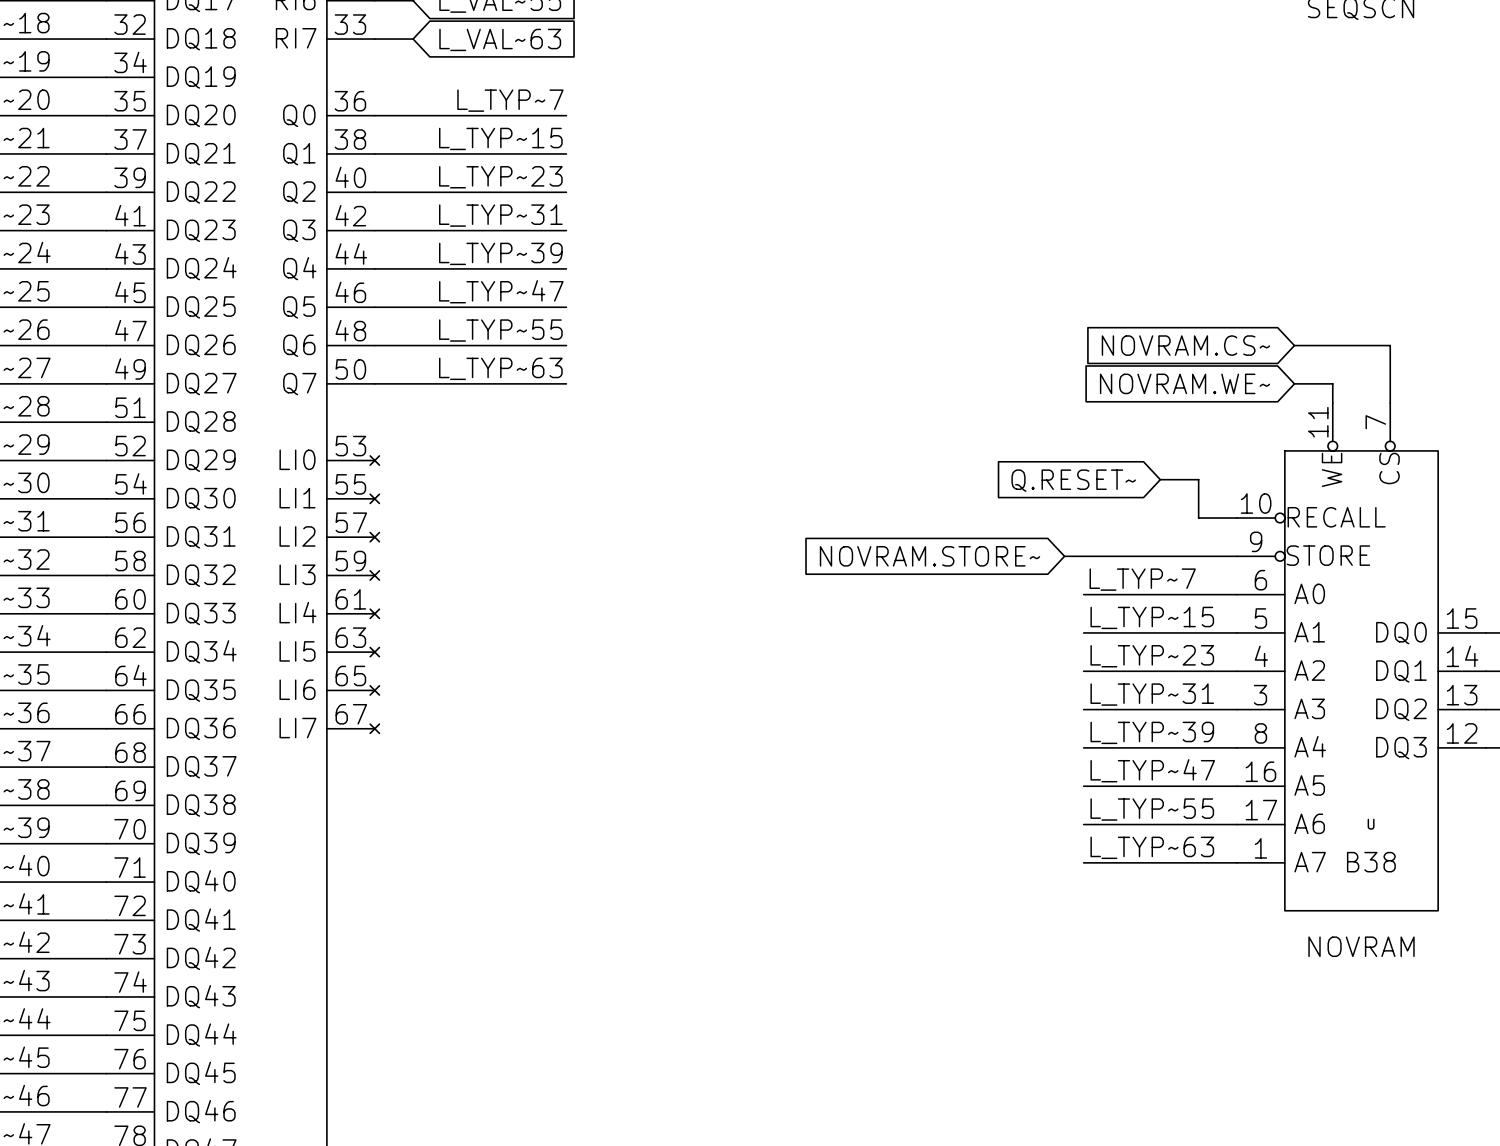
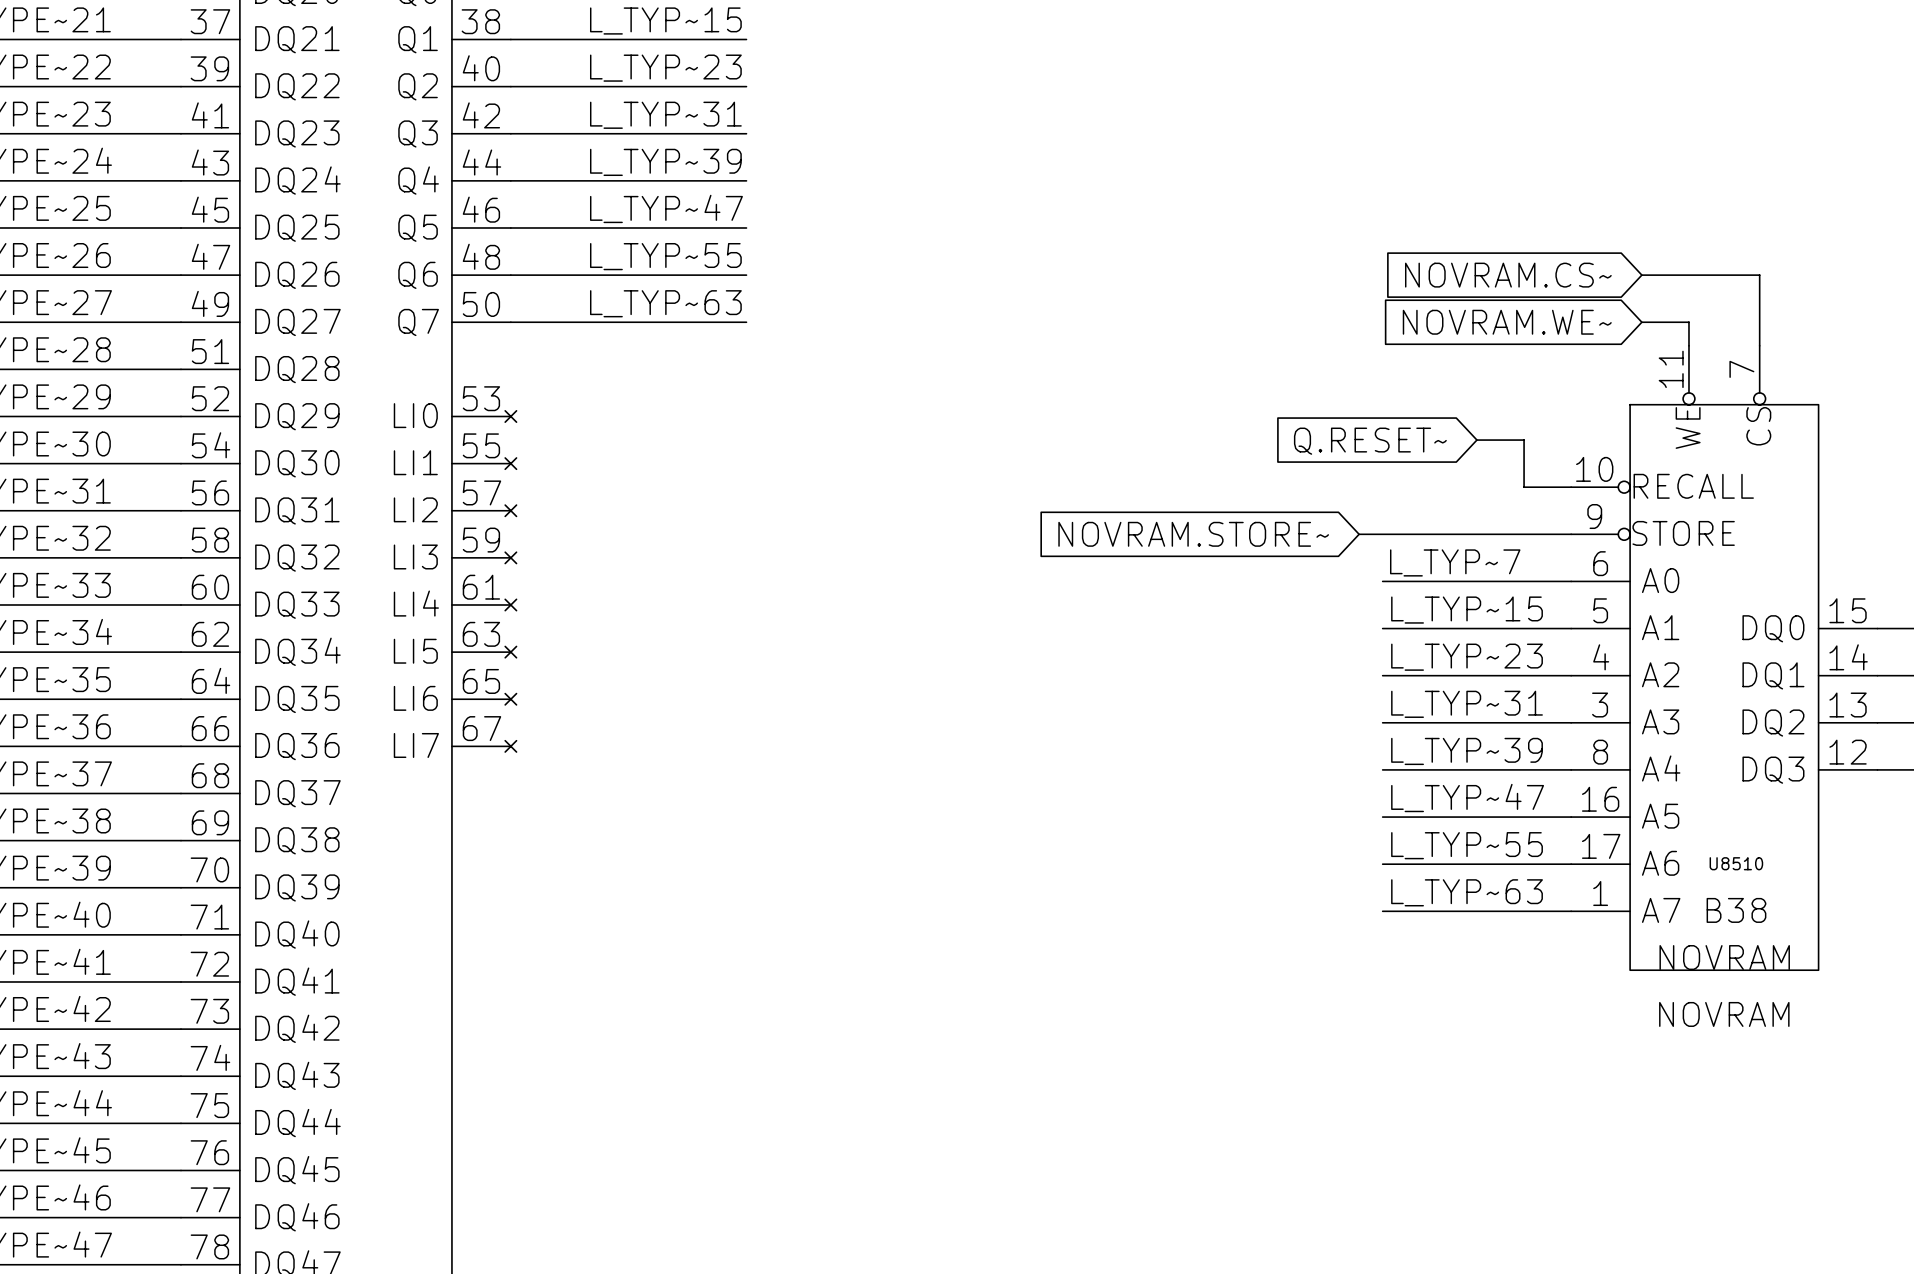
U name: U (1371, 824) -> U8510 (1736, 863)
U value: none -> NOVRAM (1724, 957)

